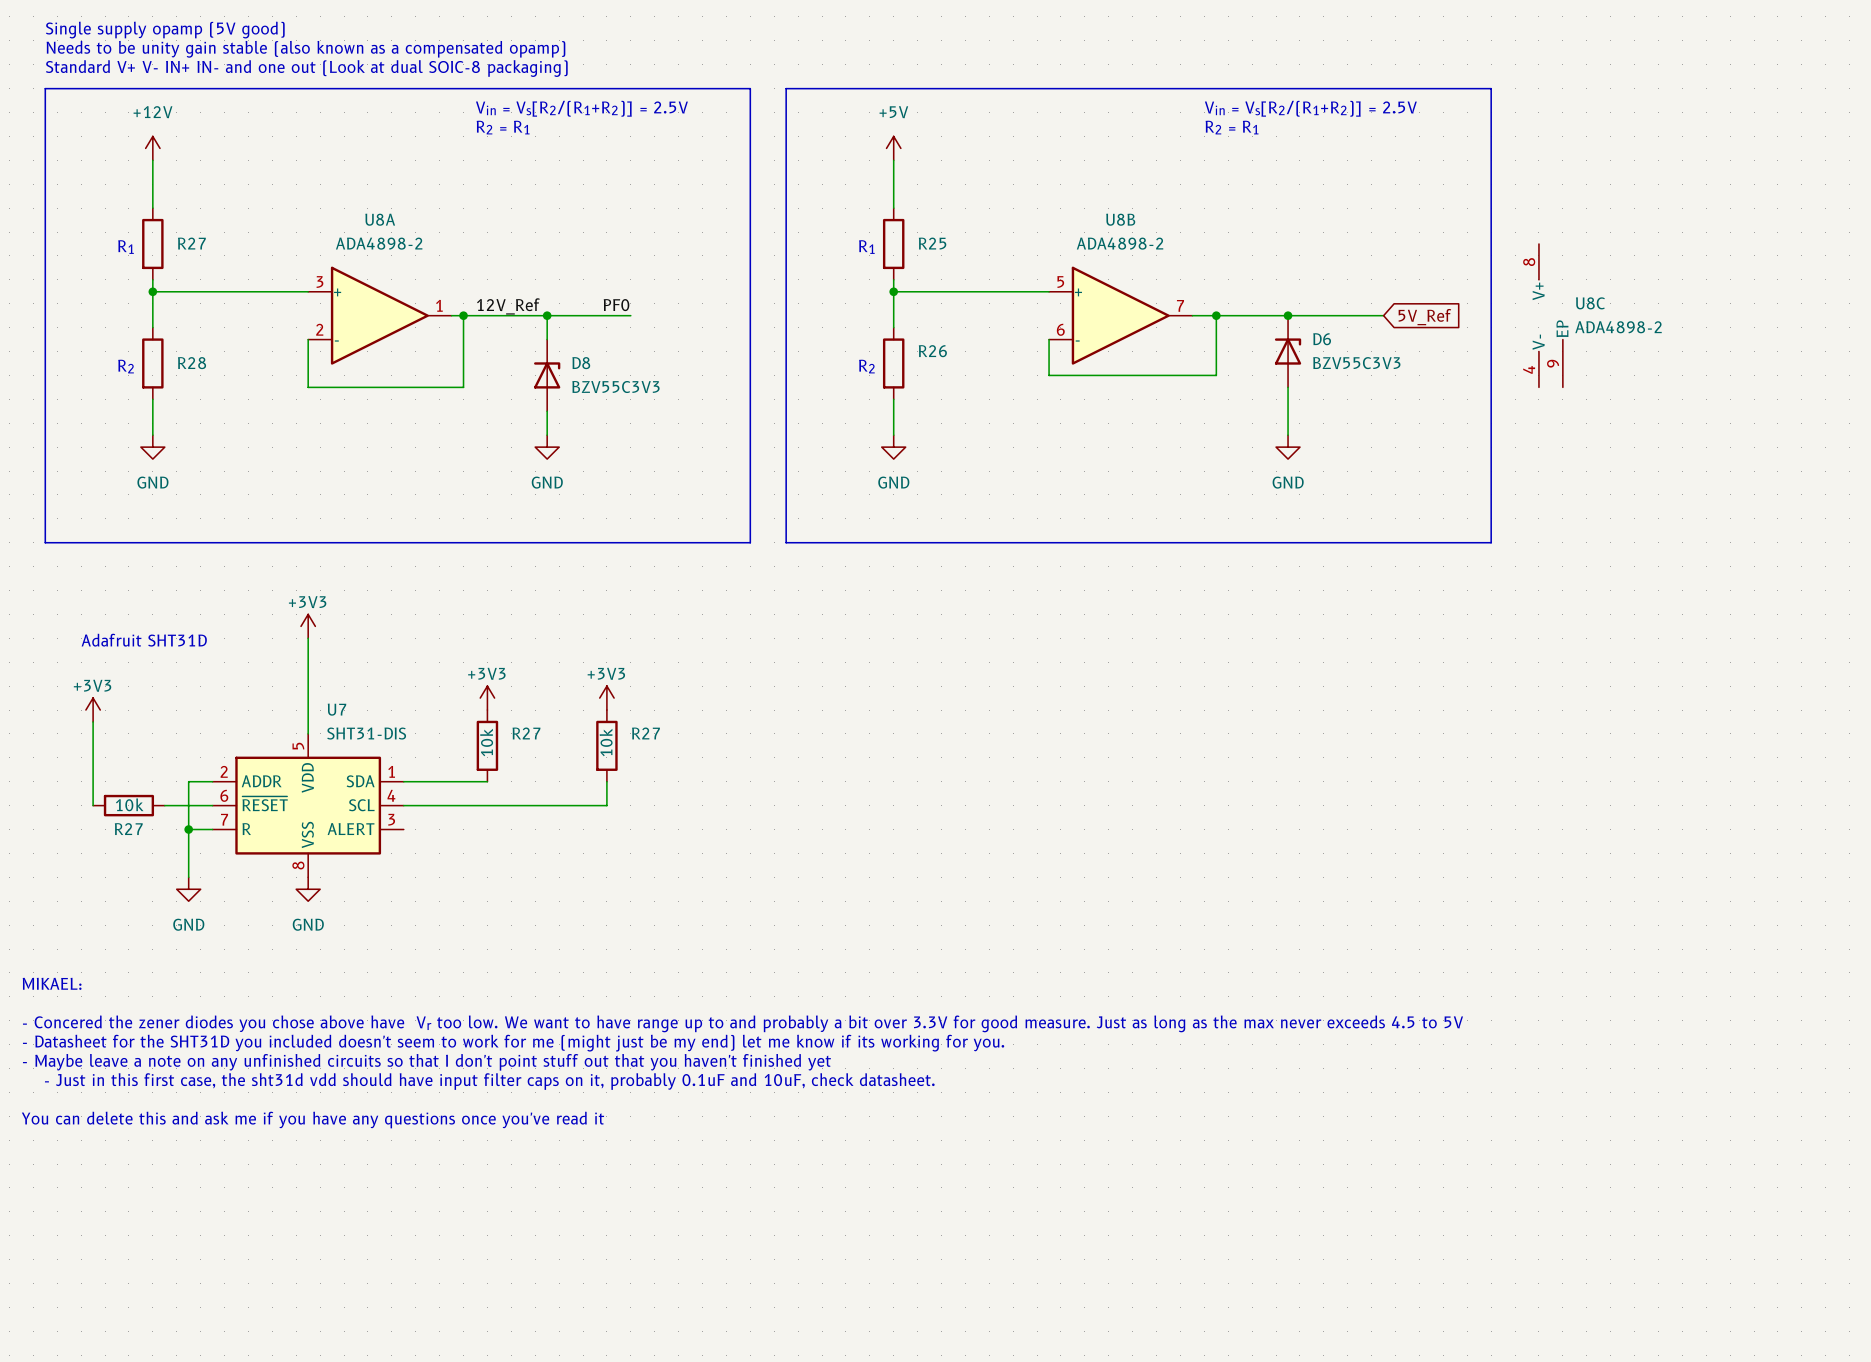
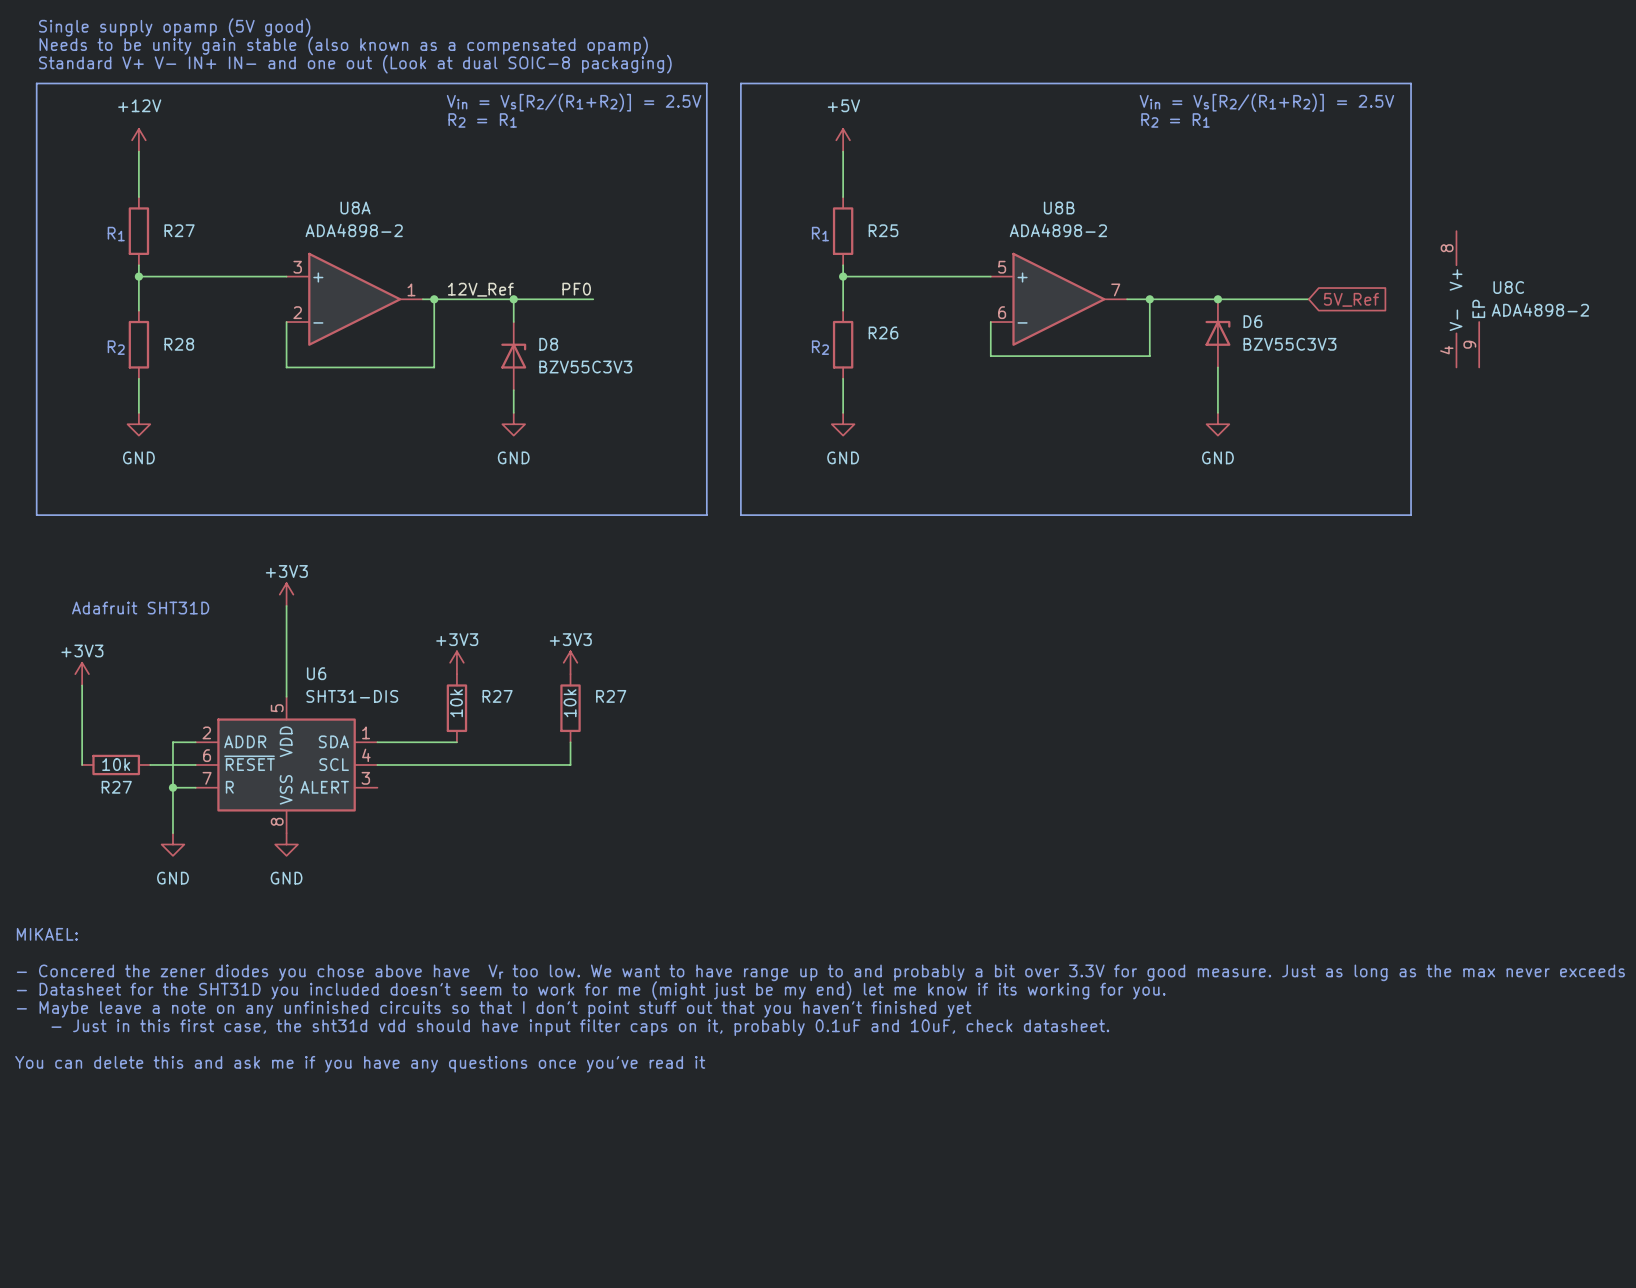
U7 name: U7 (337, 709) -> U6 (316, 673)

